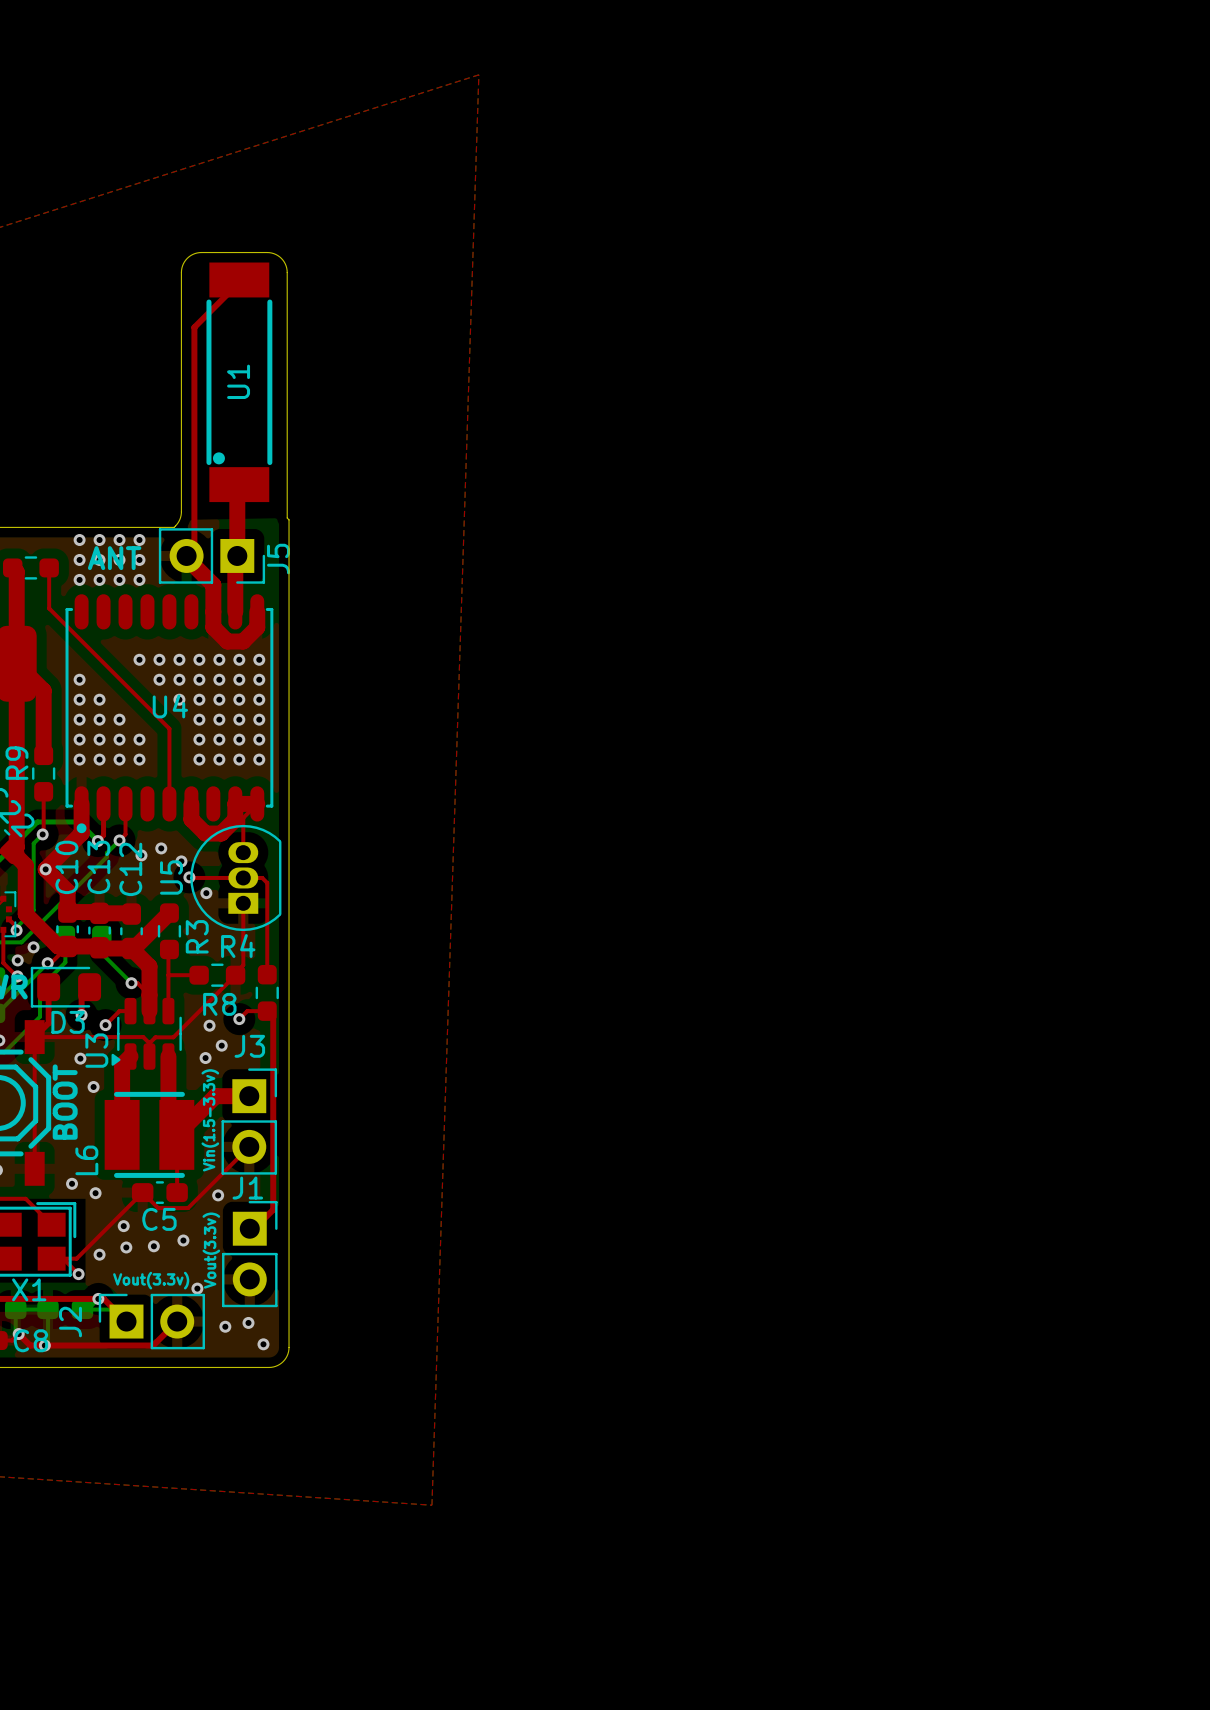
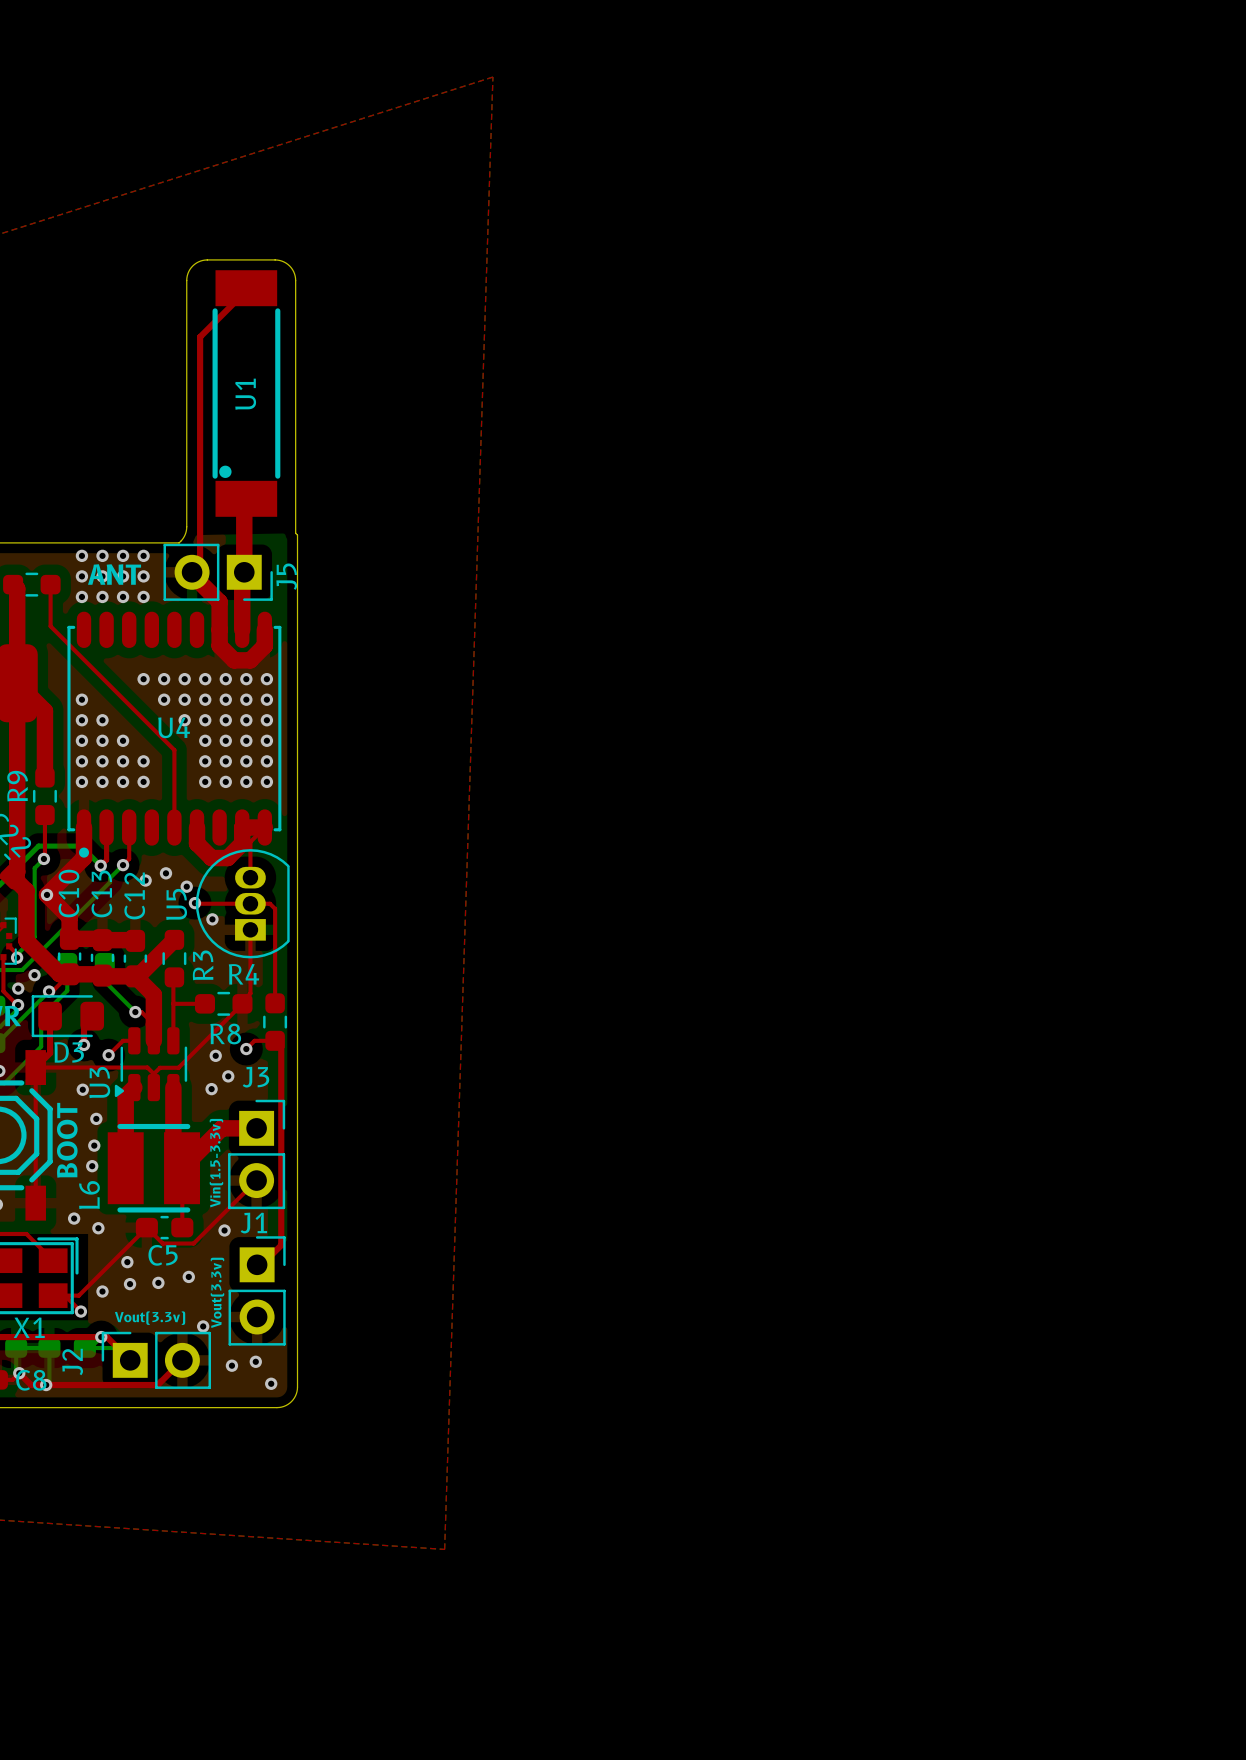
via: none -> (94, 1145)
via: none -> (92, 1166)

